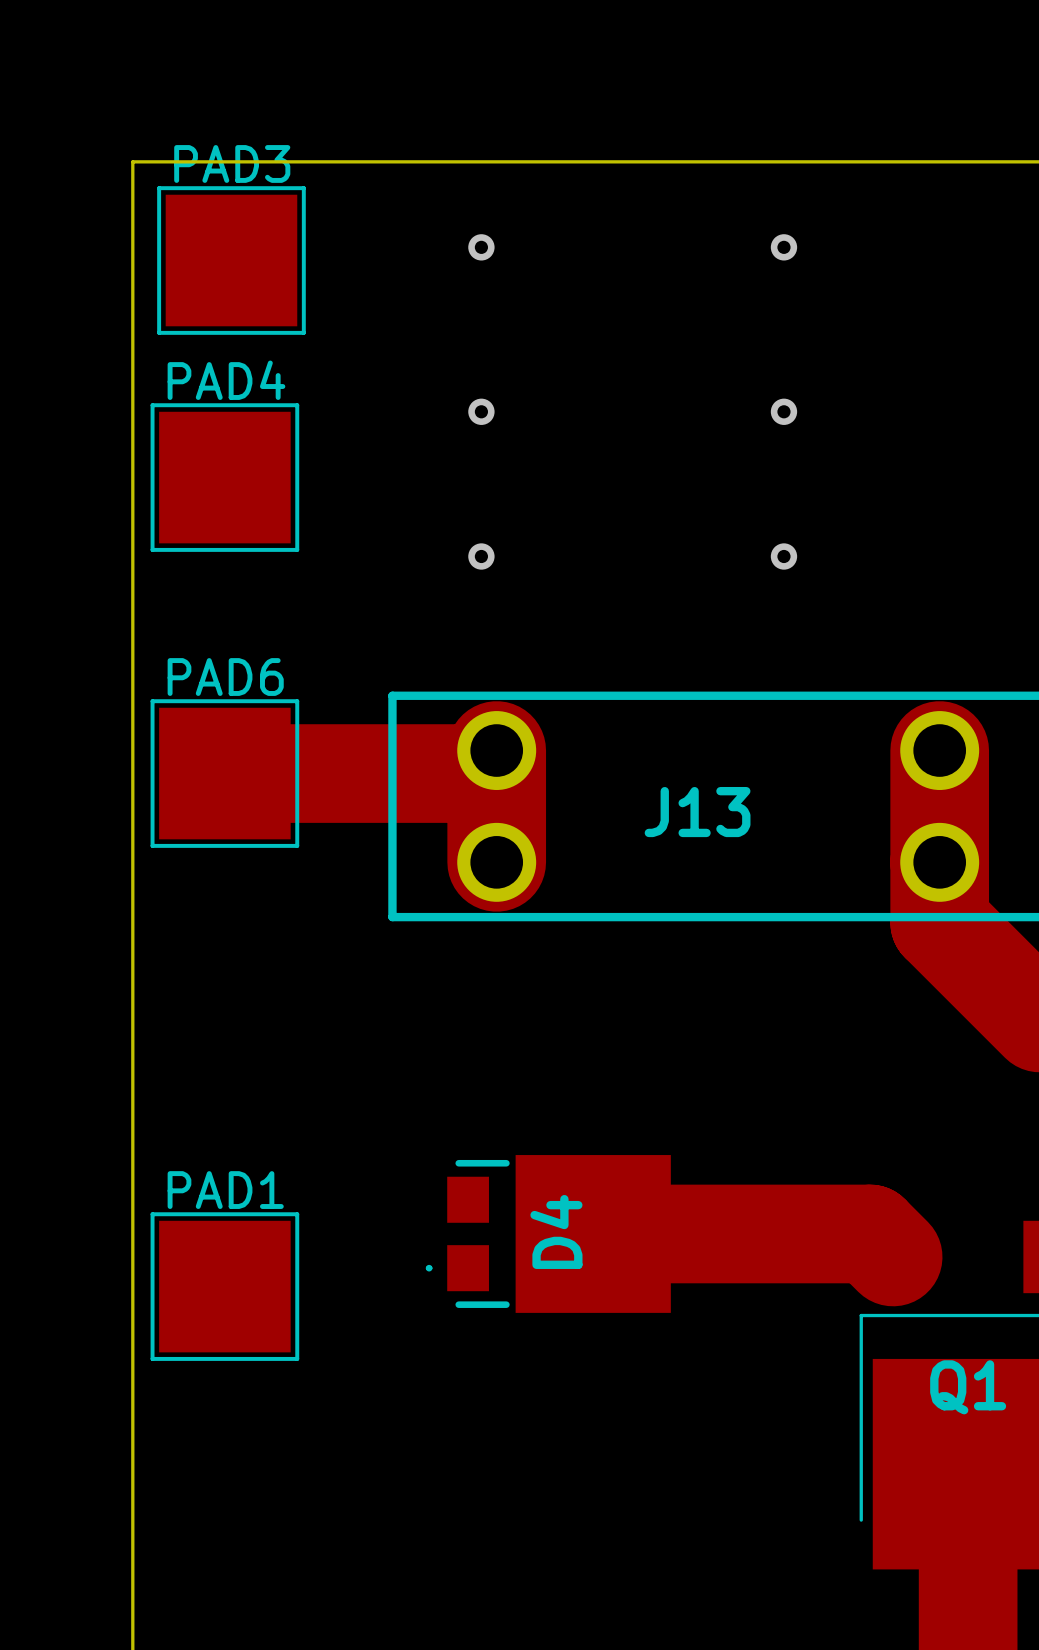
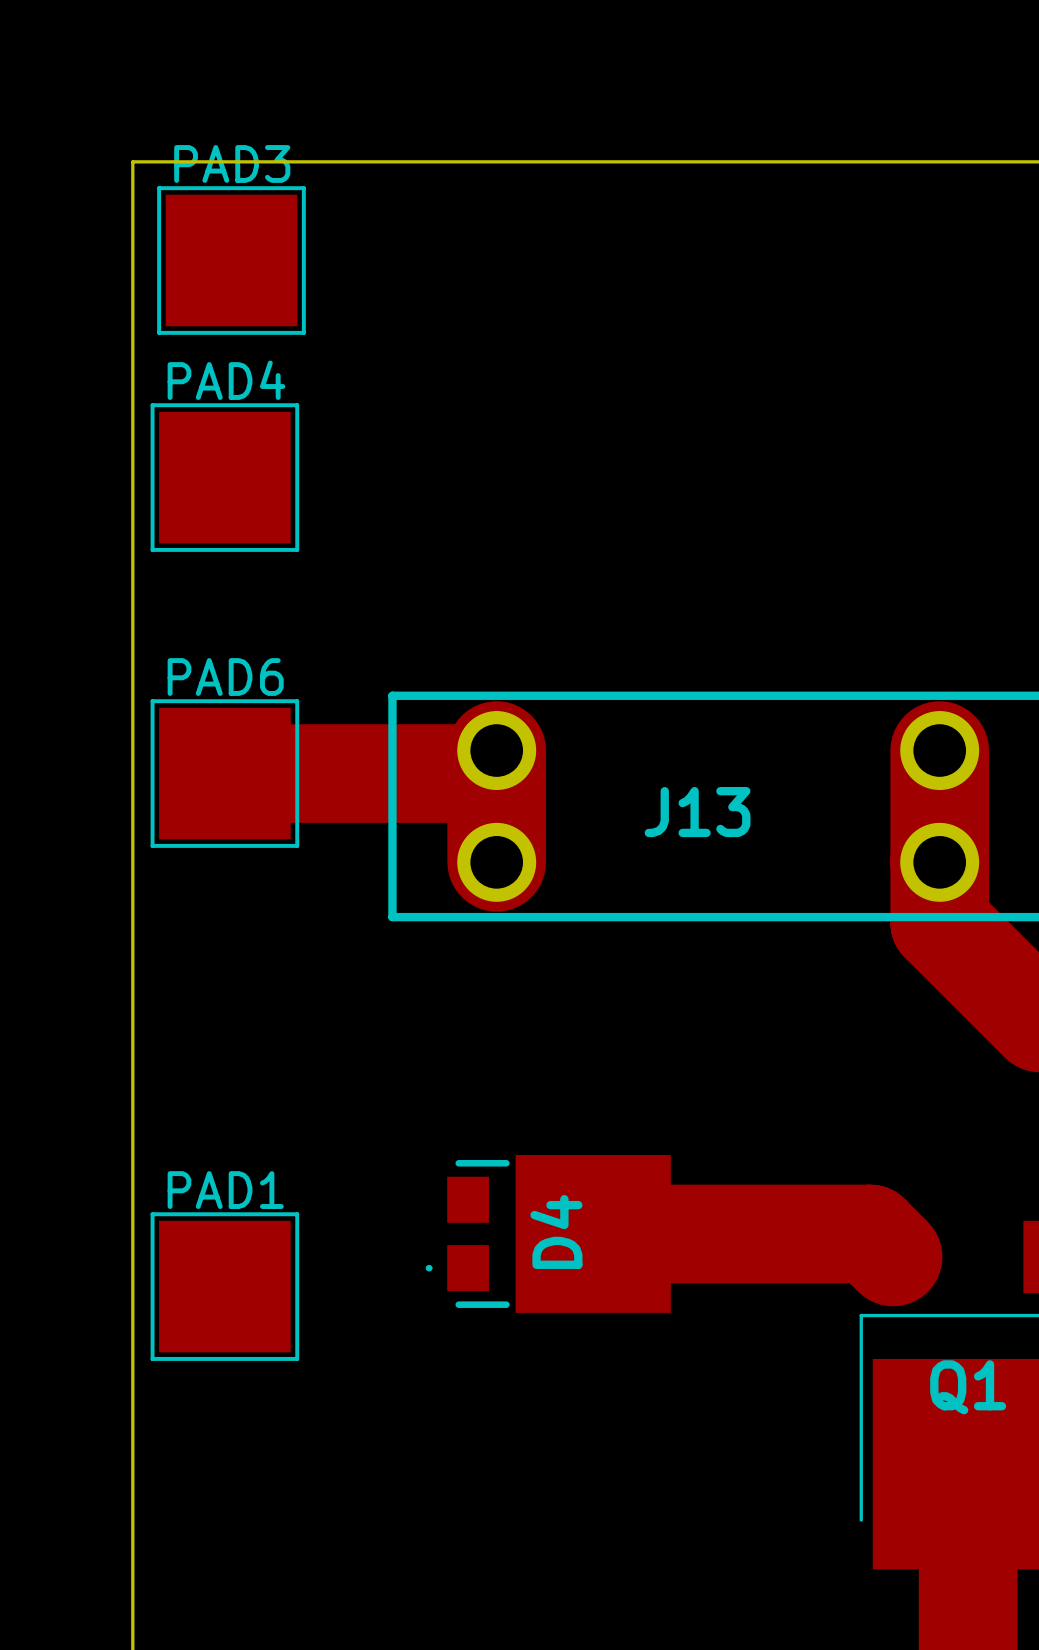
via: (481, 247) -> none
via: (783, 247) -> none
via: (481, 411) -> none
via: (783, 411) -> none
via: (481, 556) -> none
via: (783, 556) -> none

